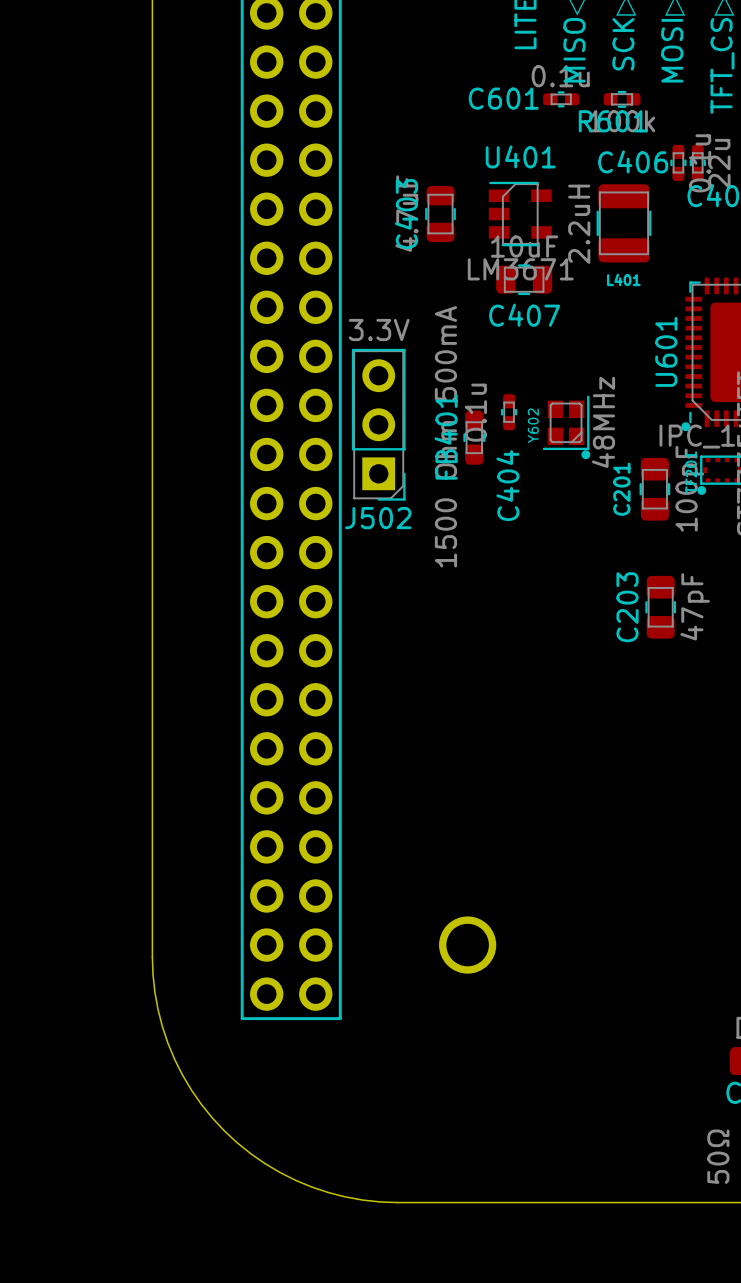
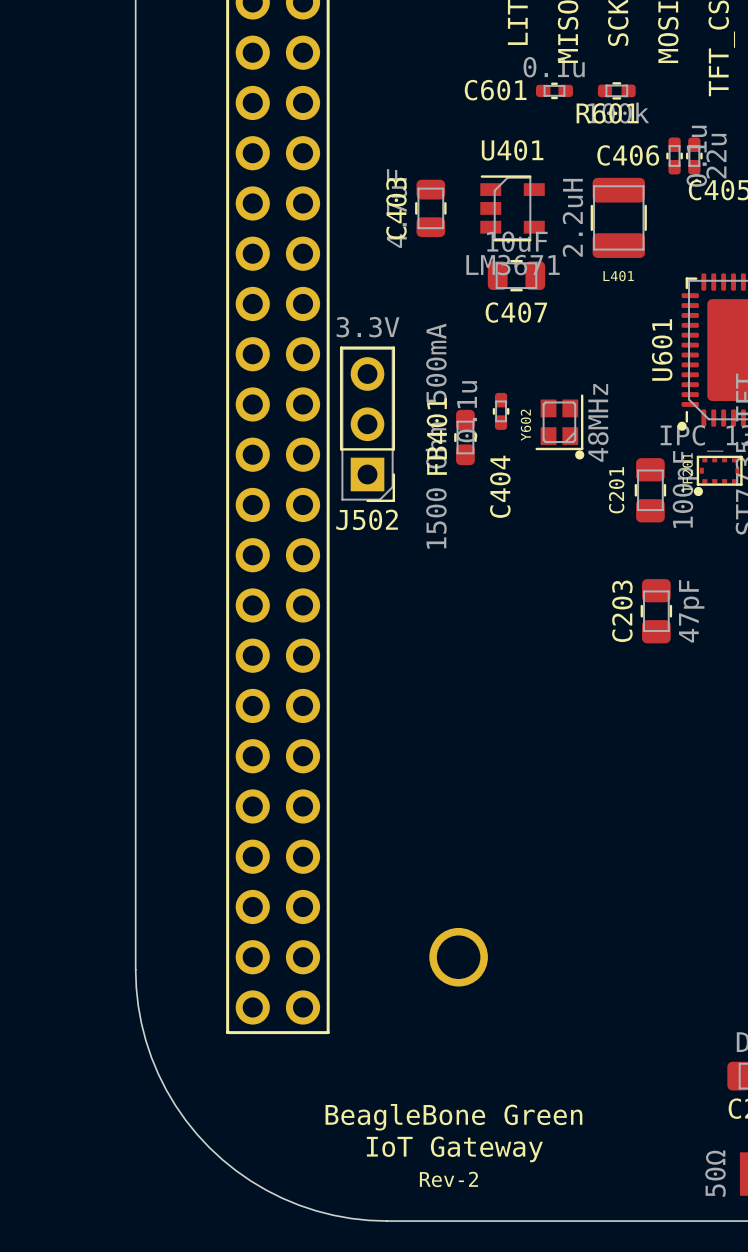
text: none -> BeagleBone Green (453, 1117)
text: none -> IoT Gateway (454, 1149)
text: none -> Rev-2 (448, 1179)

